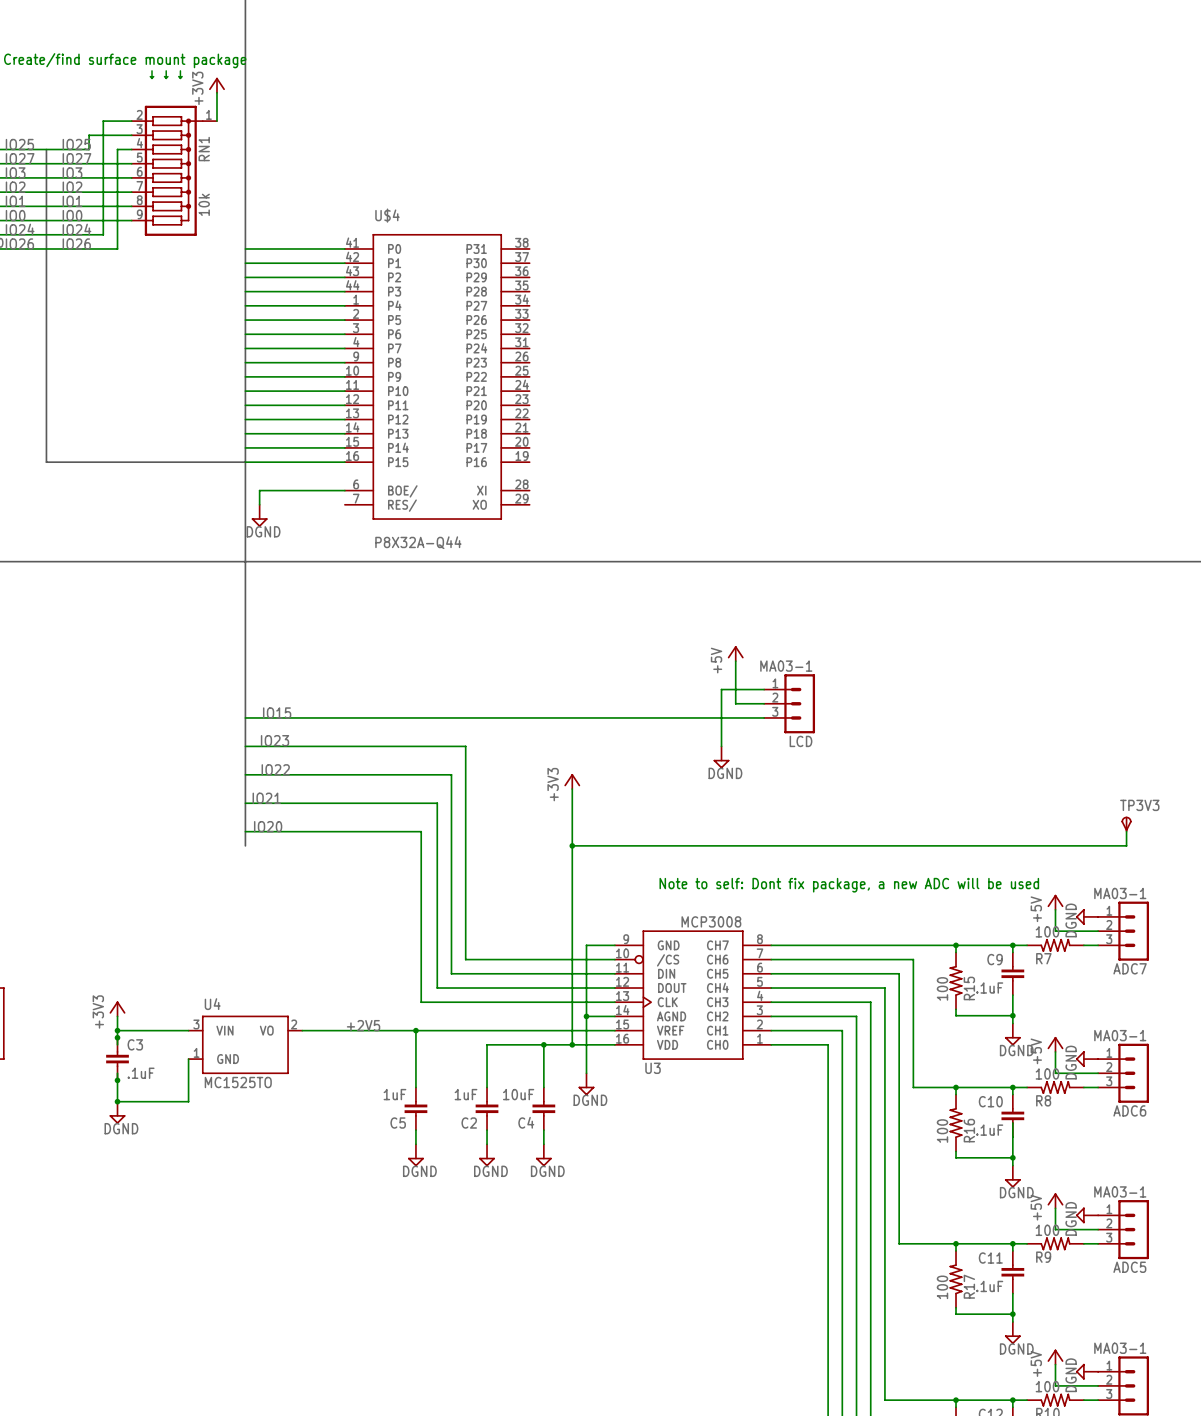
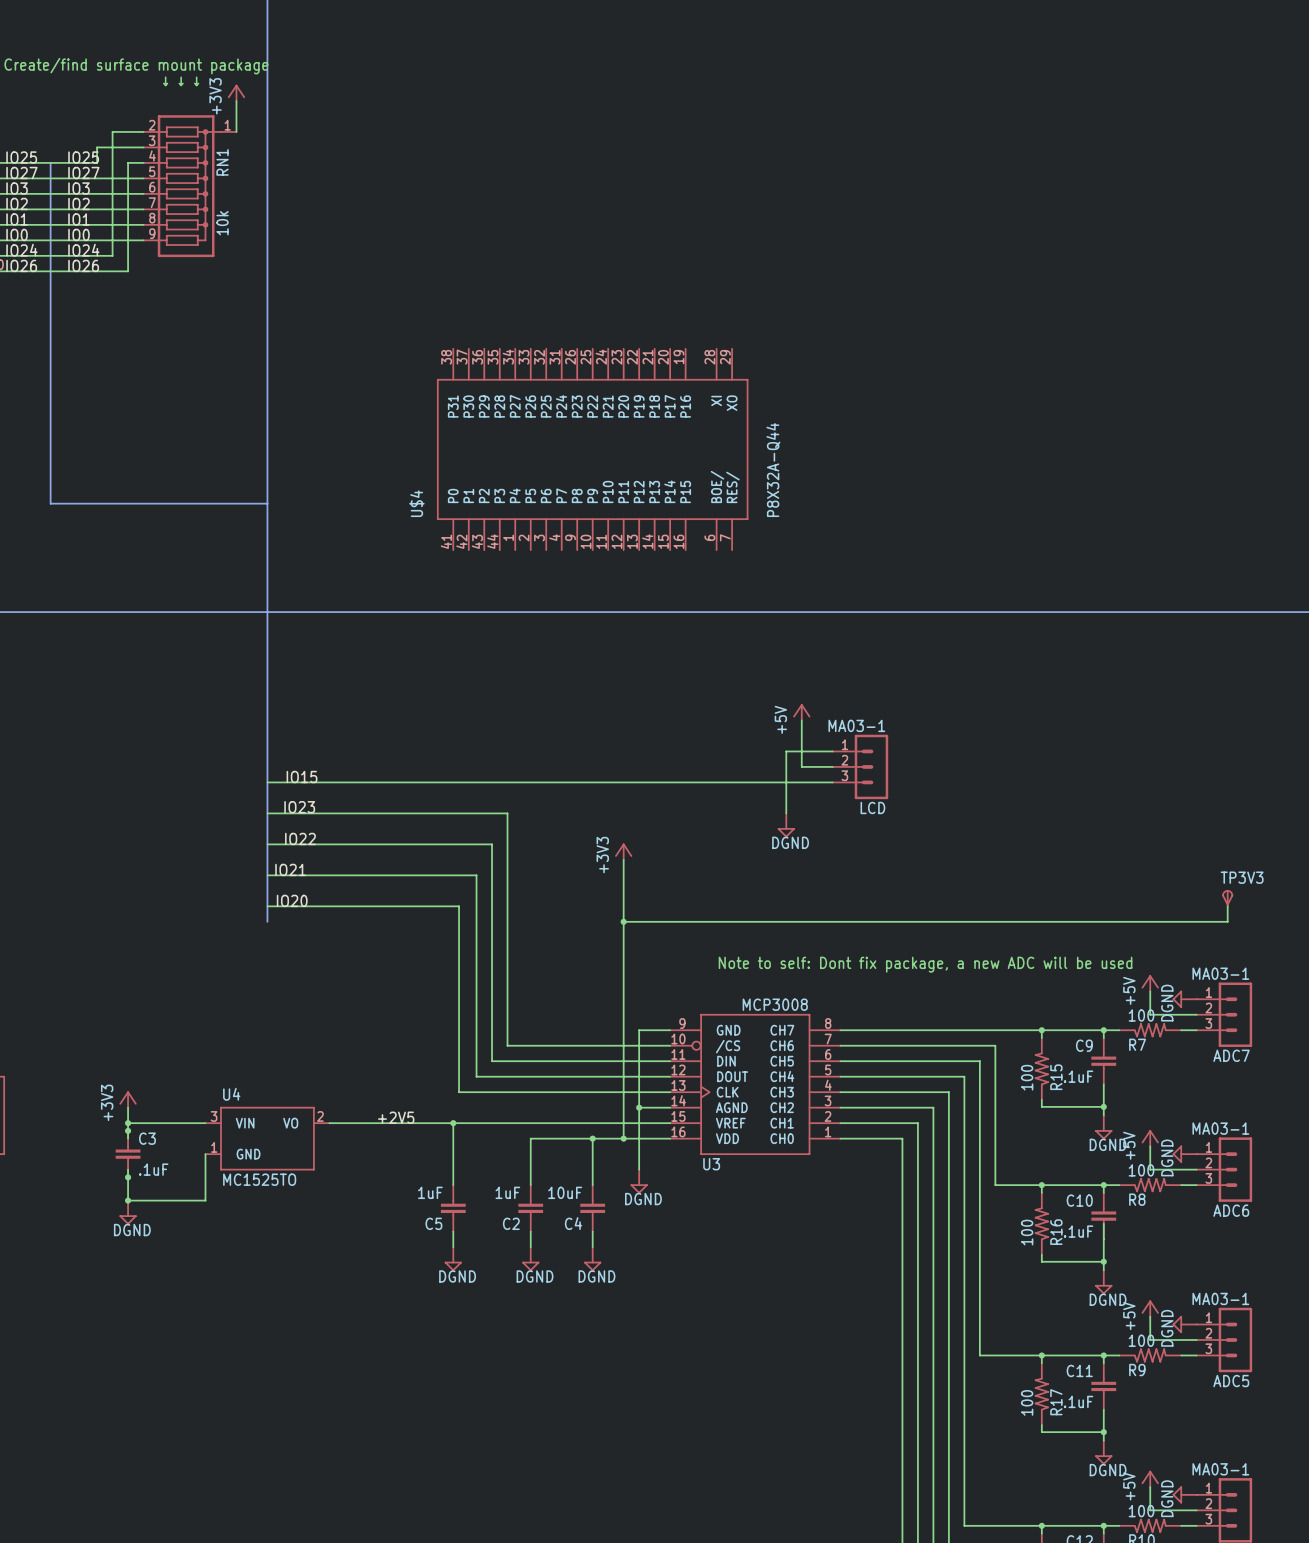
wire: (245, 248) (344, 248) -> none
wire: (245, 263) (344, 263) -> none
wire: (245, 277) (344, 277) -> none
wire: (245, 291) (344, 291) -> none
wire: (245, 305) (344, 305) -> none
wire: (245, 320) (344, 320) -> none
wire: (245, 334) (344, 334) -> none
wire: (245, 348) (344, 348) -> none
wire: (245, 362) (344, 362) -> none
wire: (245, 376) (344, 376) -> none
U$4 rotation: 0° (437, 376) -> 90° counterclockwise (592, 449)
wire: (245, 391) (344, 391) -> none
wire: (245, 405) (344, 405) -> none
wire: (245, 419) (344, 419) -> none
wire: (245, 433) (344, 433) -> none
wire: (245, 447) (344, 447) -> none
wire: (245, 462) (344, 462) -> none
wire: (344, 490) (259, 490) (259, 504) -> none
power symbol: DGND (259, 515) -> none

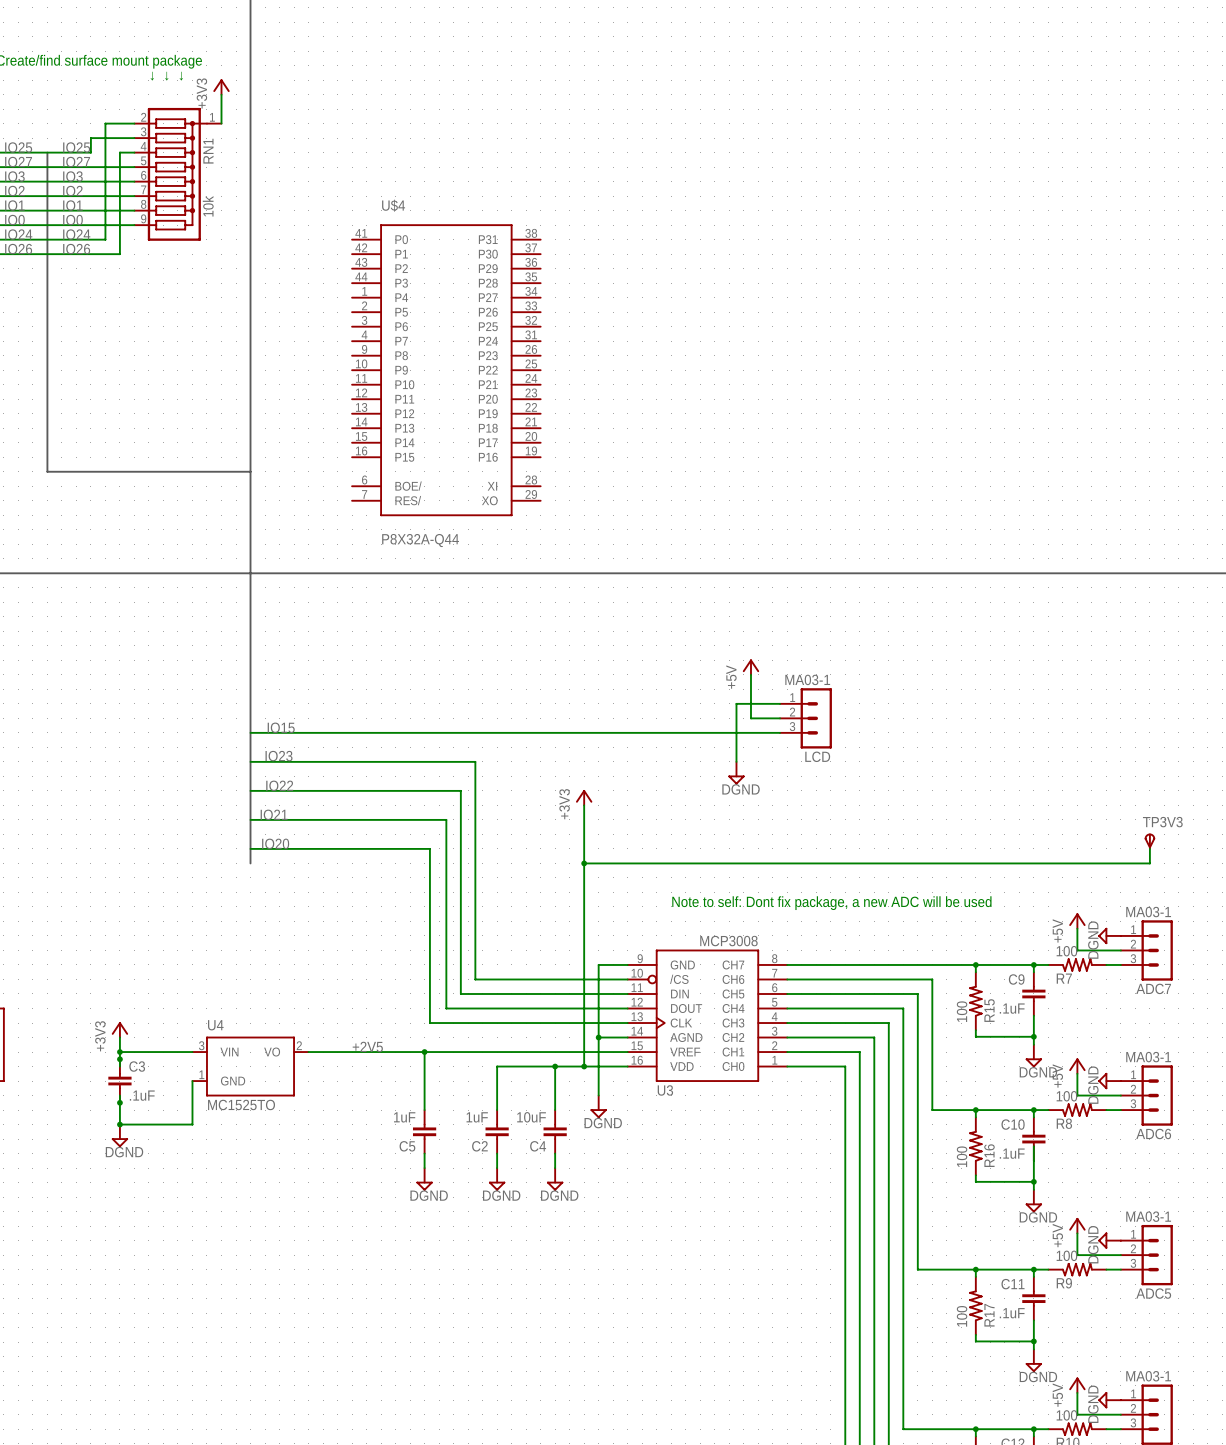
U$4 rotation: 0° (592, 449) -> 90° clockwise (446, 370)

